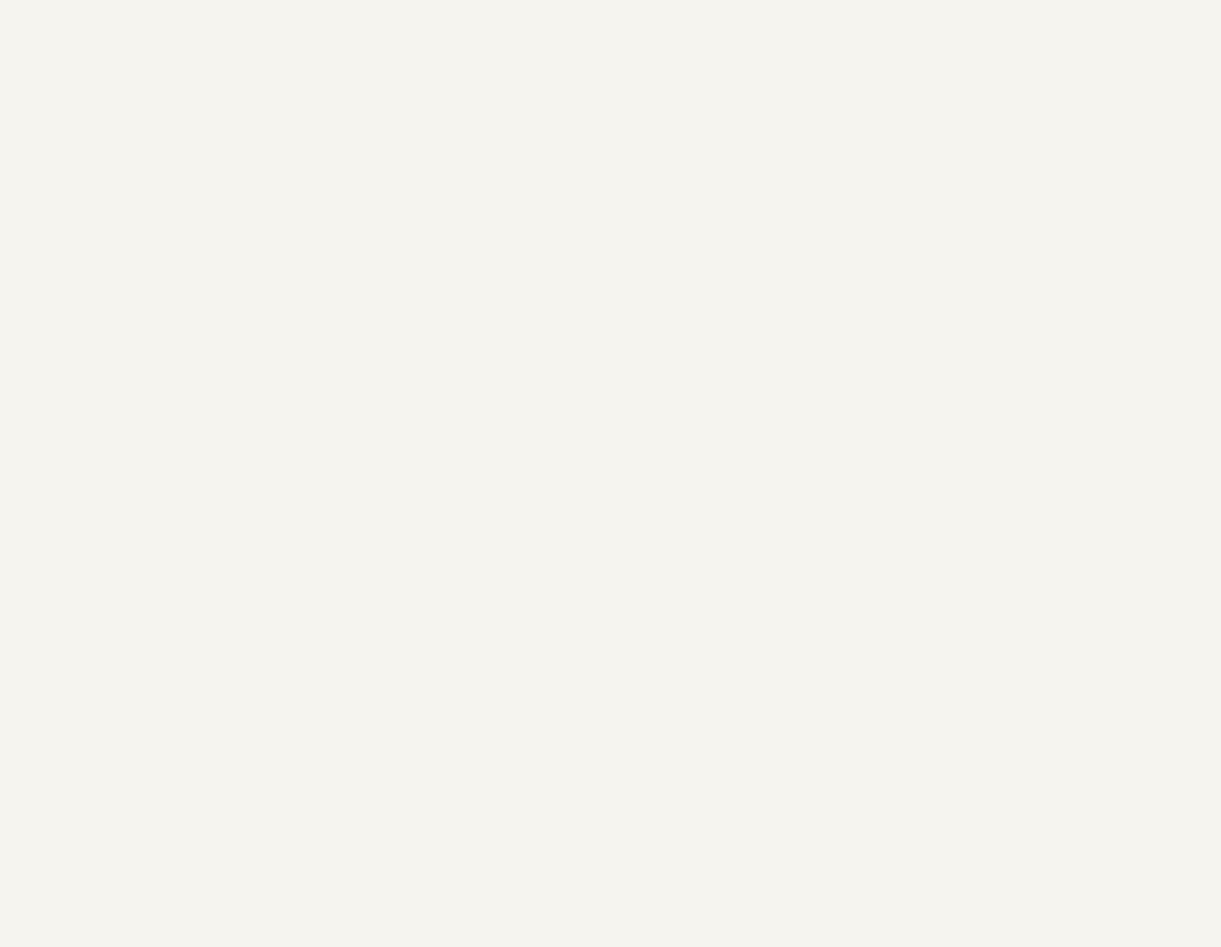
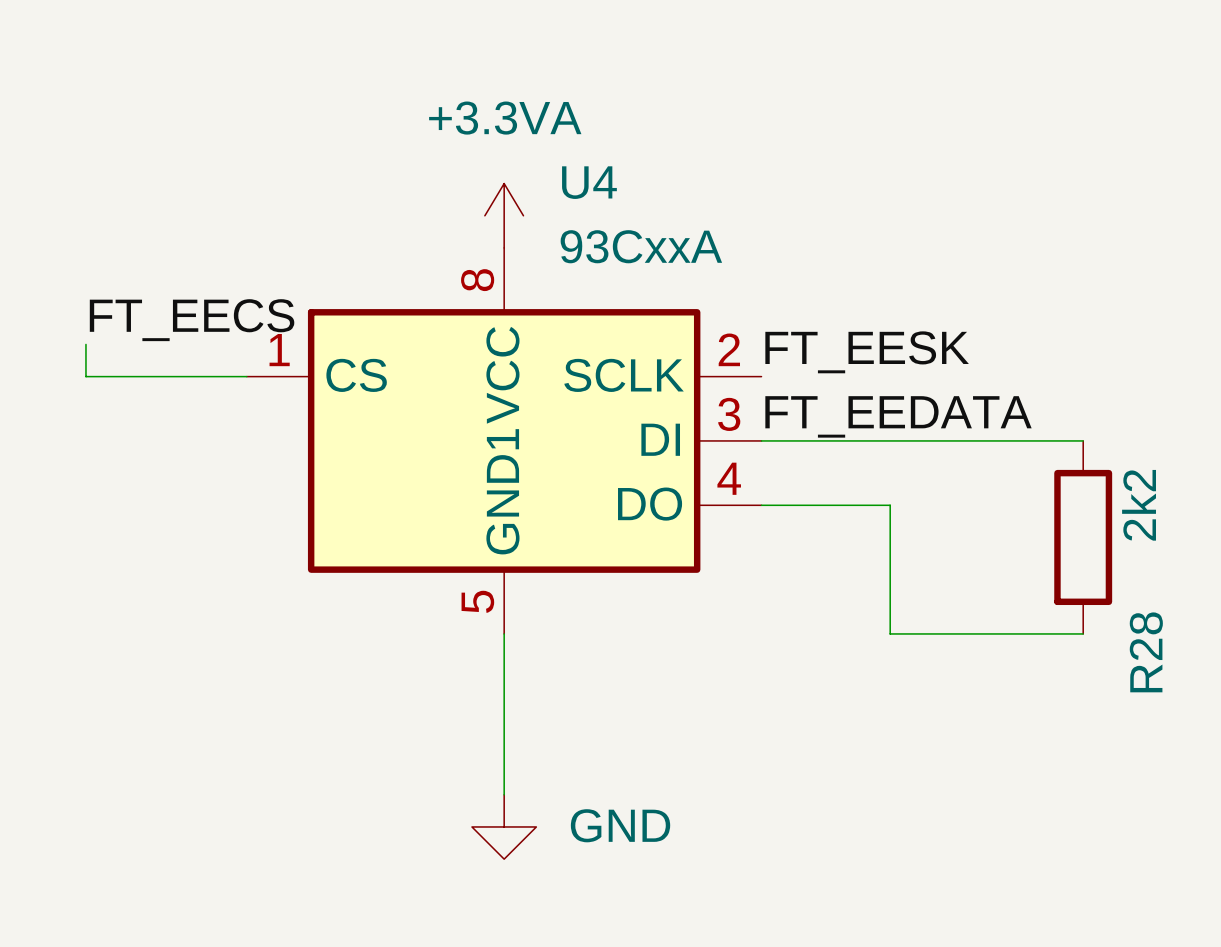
power symbol: none -> +3.3VA (504, 215)
label: none -> FT_EECS (192, 320)
wire: none -> (85, 344) (85, 376) (246, 376)
label: none -> FT_EESK (867, 352)
label: none -> FT_EEDATA (898, 416)
U4: none -> 93CxxA (504, 440)
wire: none -> (761, 440) (1083, 440)
wire: none -> (761, 505) (890, 505) (890, 633) (1083, 633)
R28: none -> 2k2 (1083, 537)
wire: none -> (504, 633) (504, 794)
power symbol: none -> GND (504, 826)

